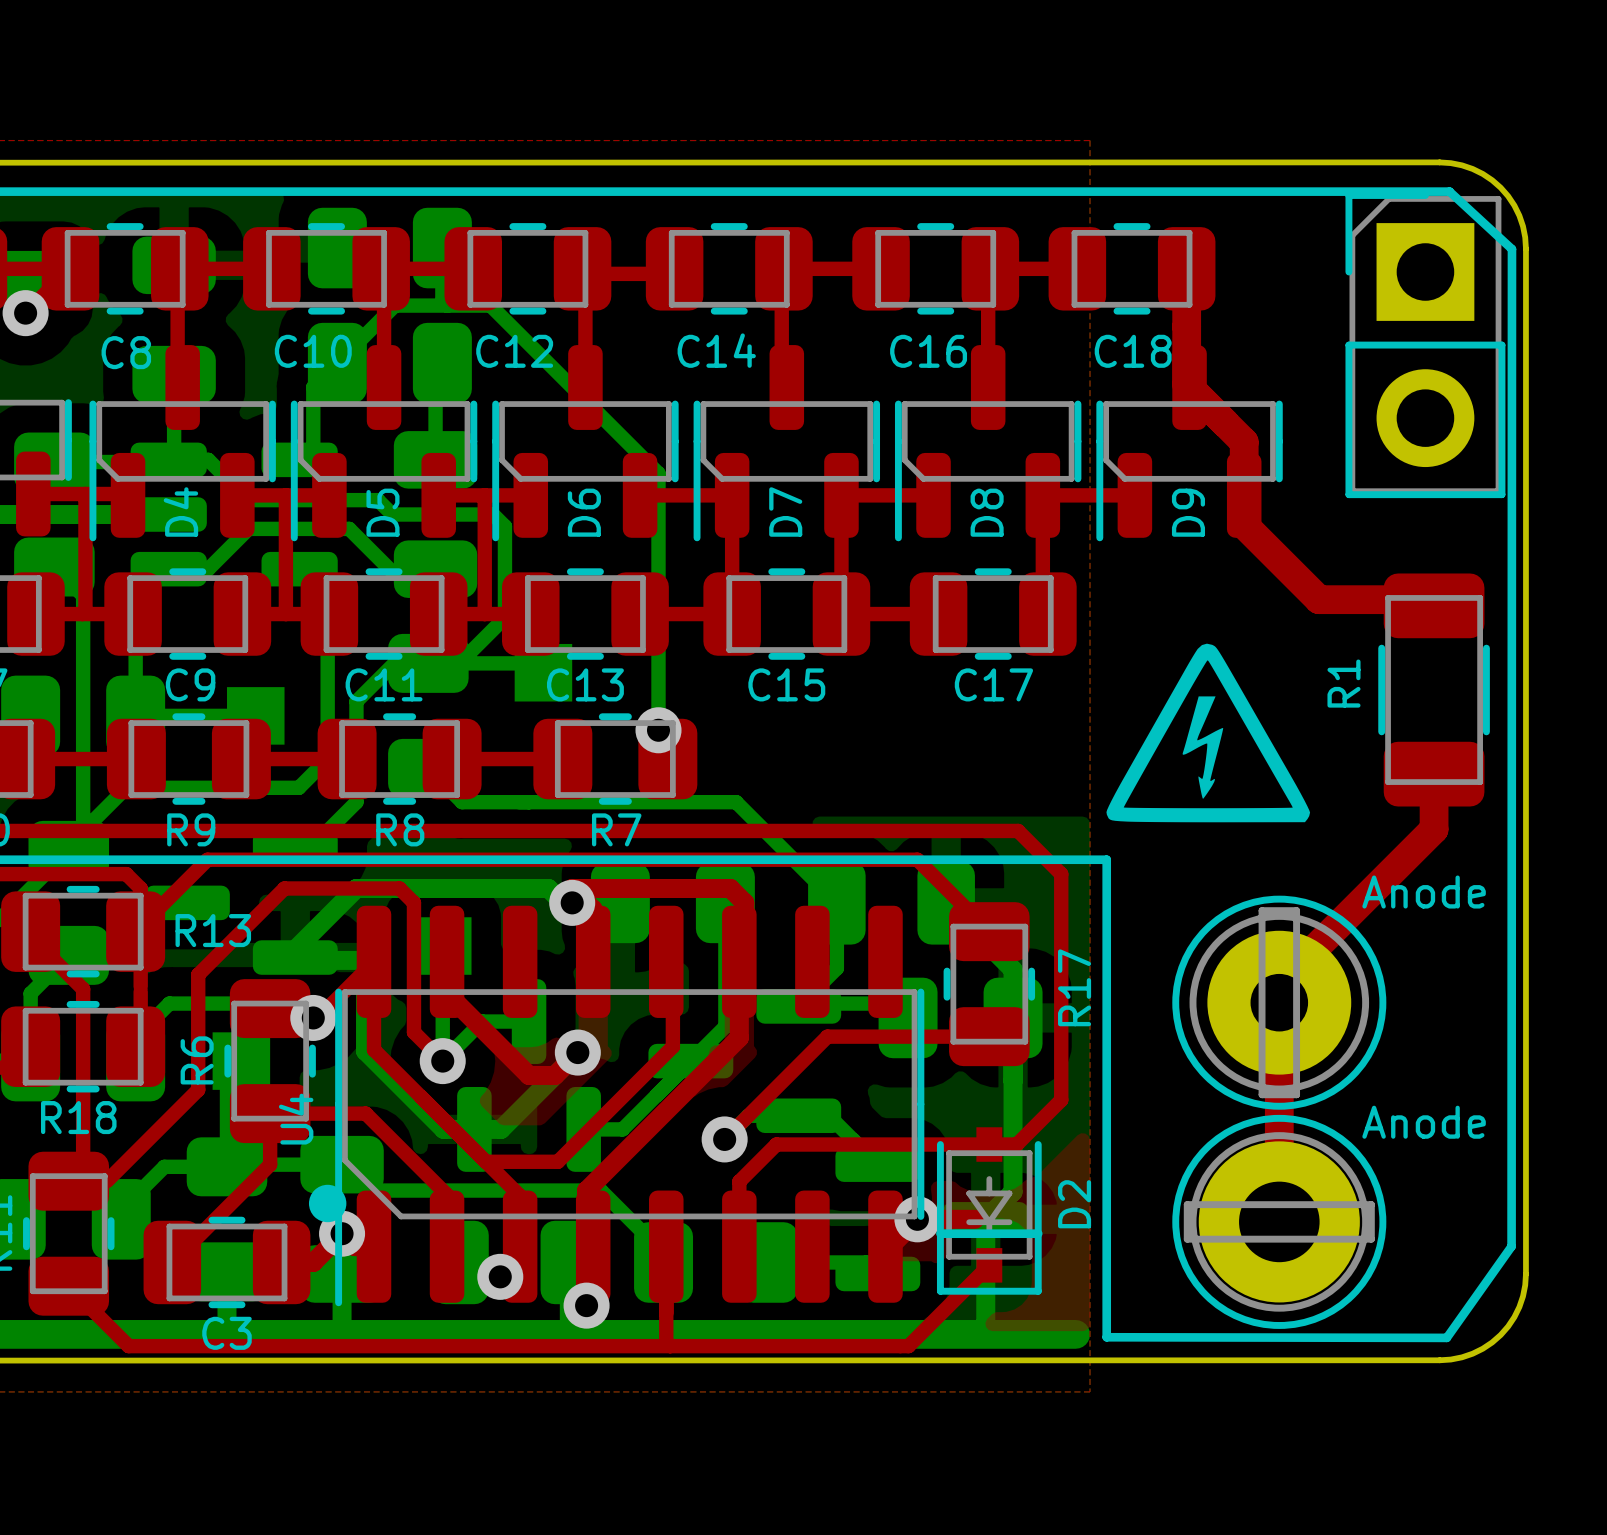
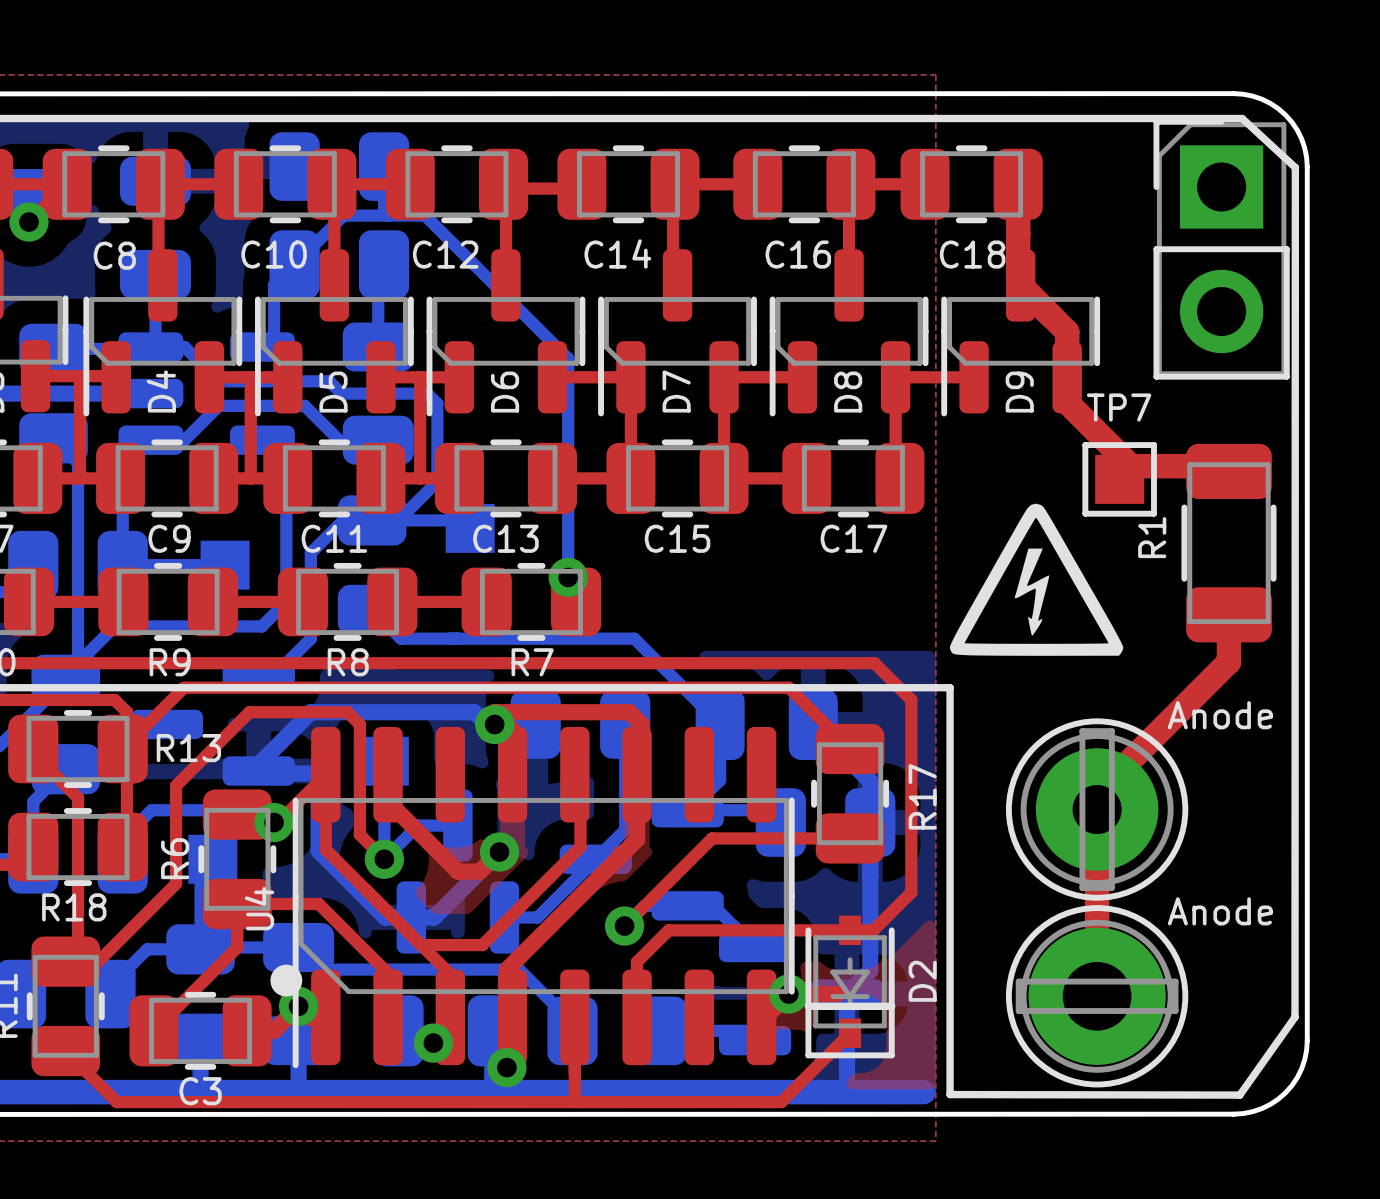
TP7: none -> (1119, 479)

